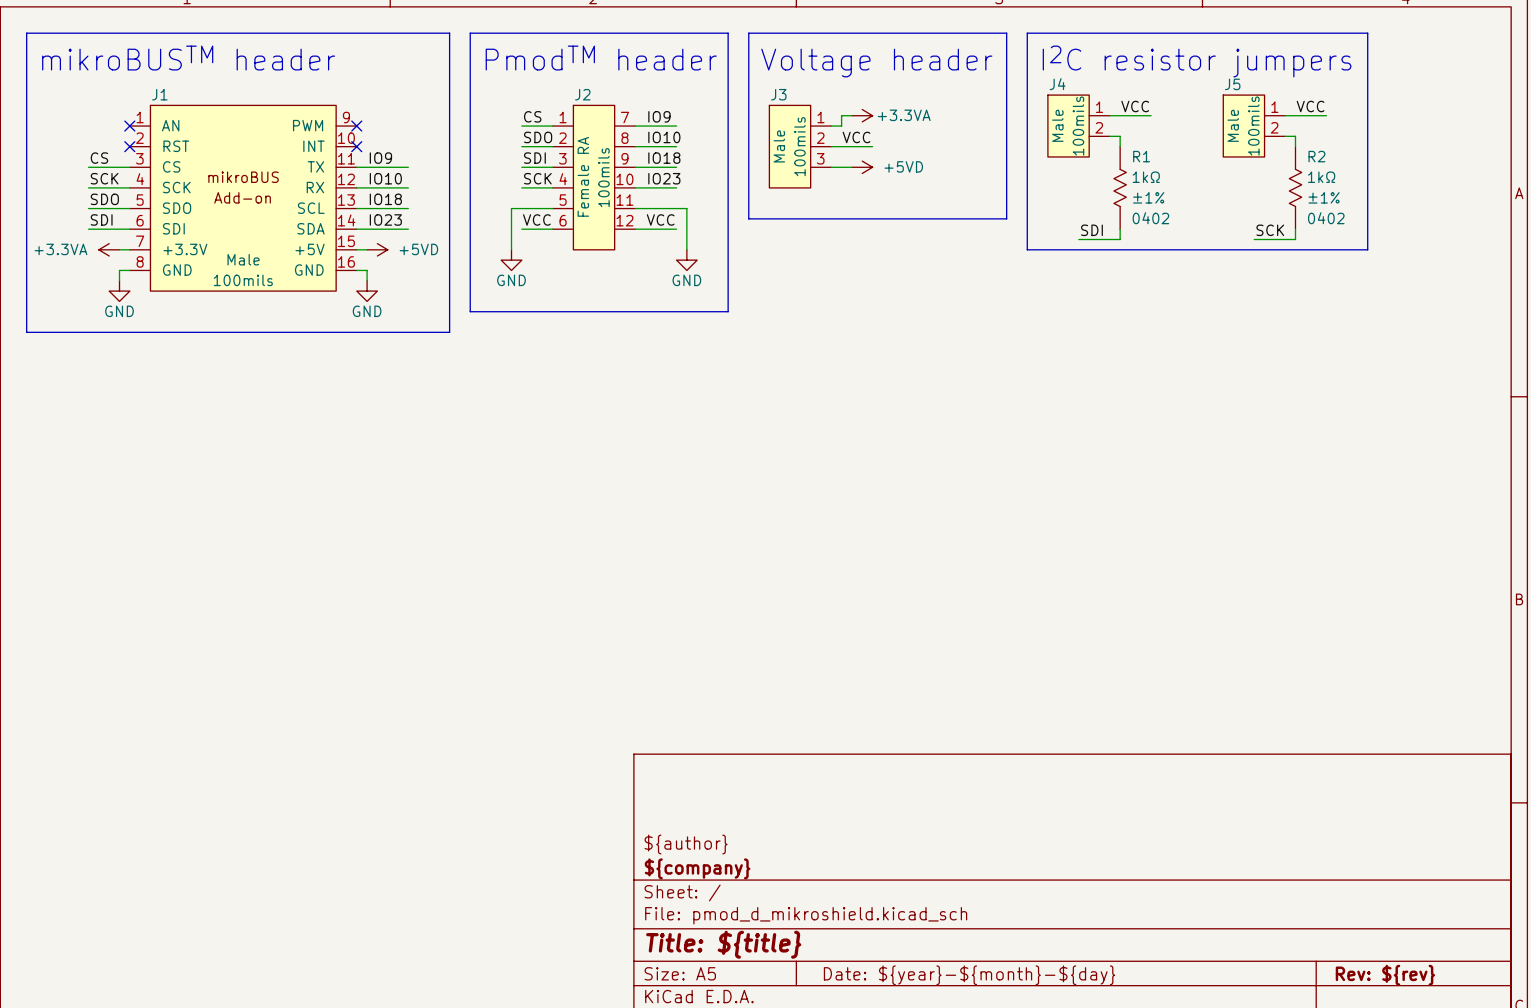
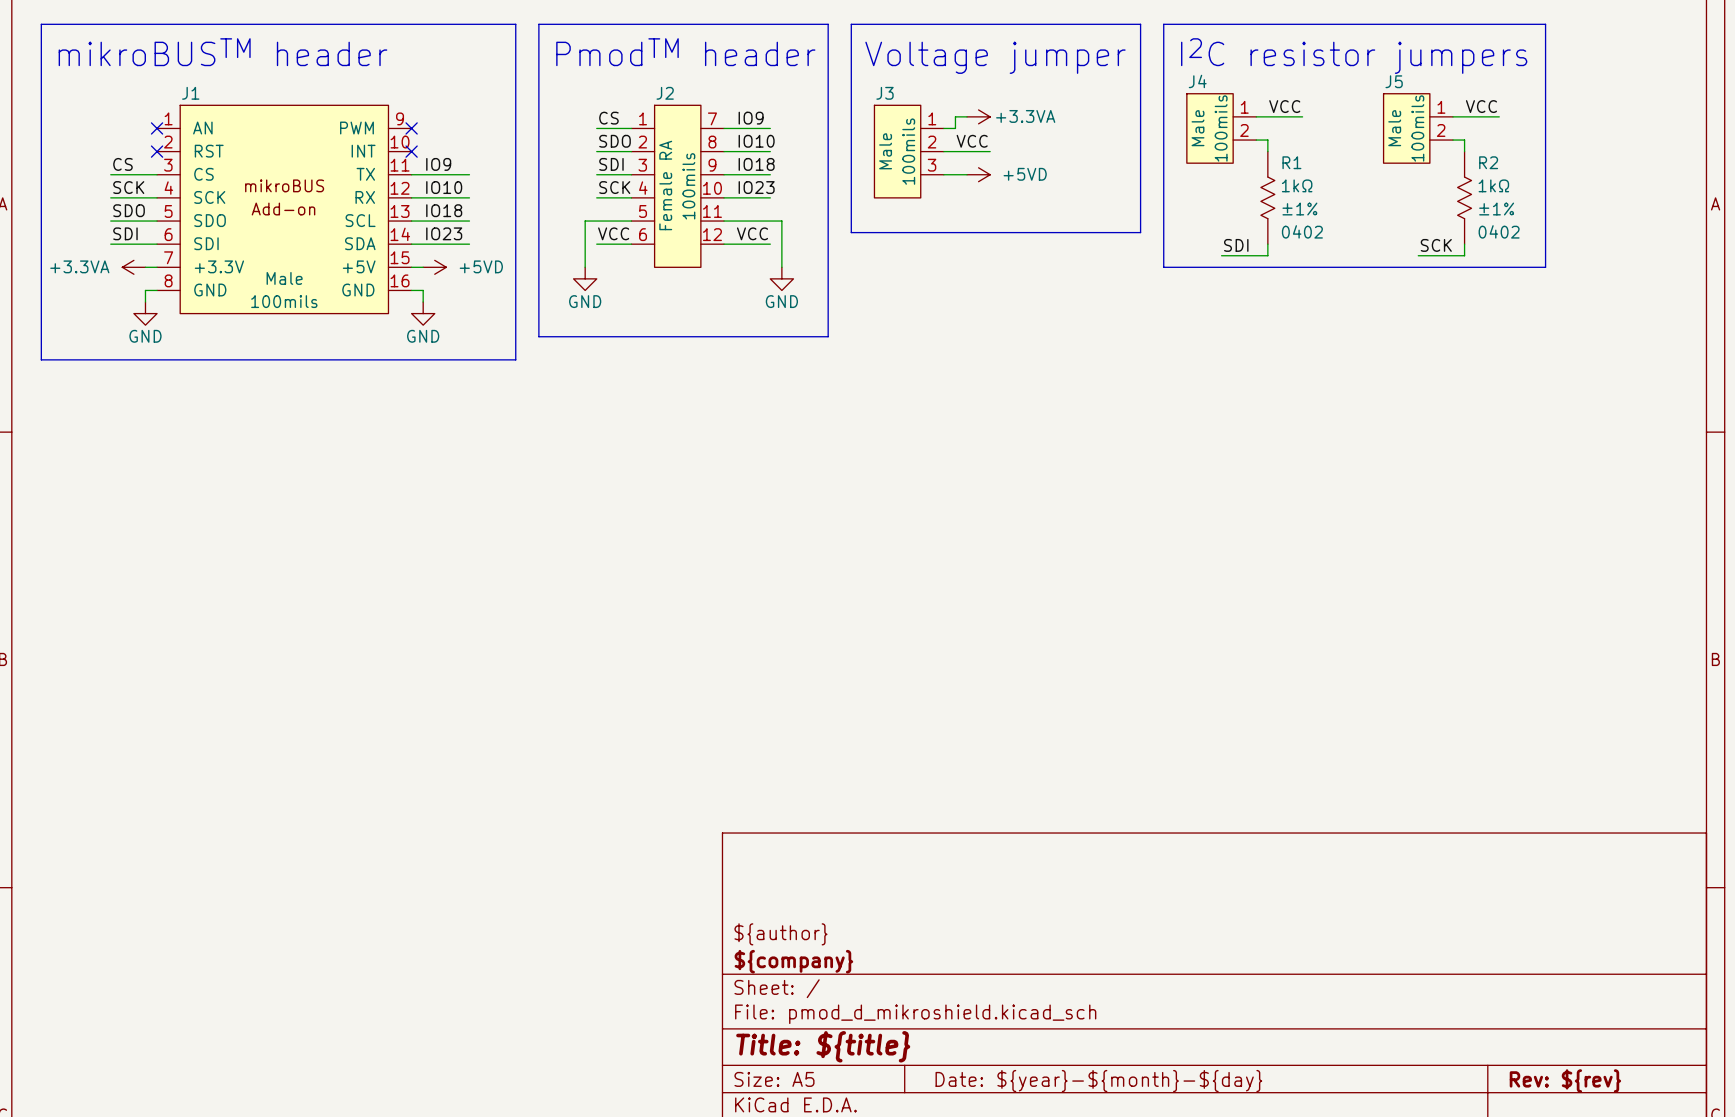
text: Voltage header (876, 63) -> Voltage jumper (995, 57)

